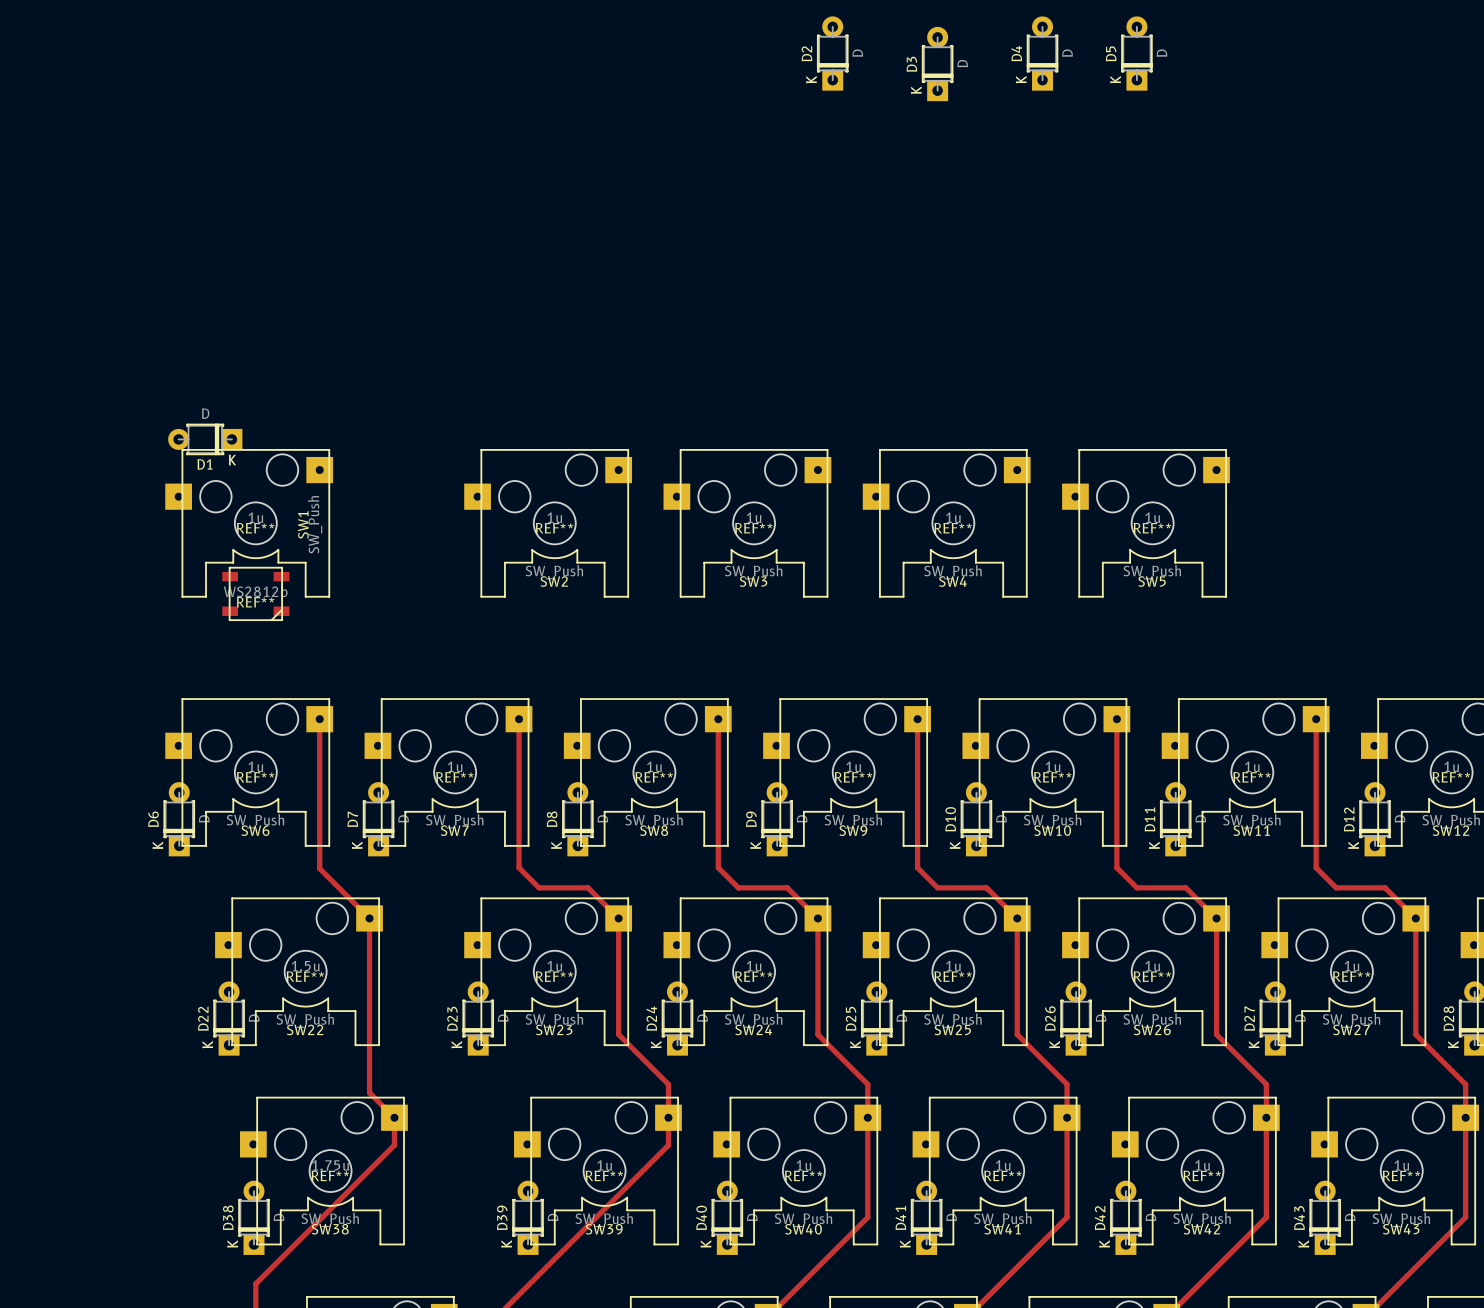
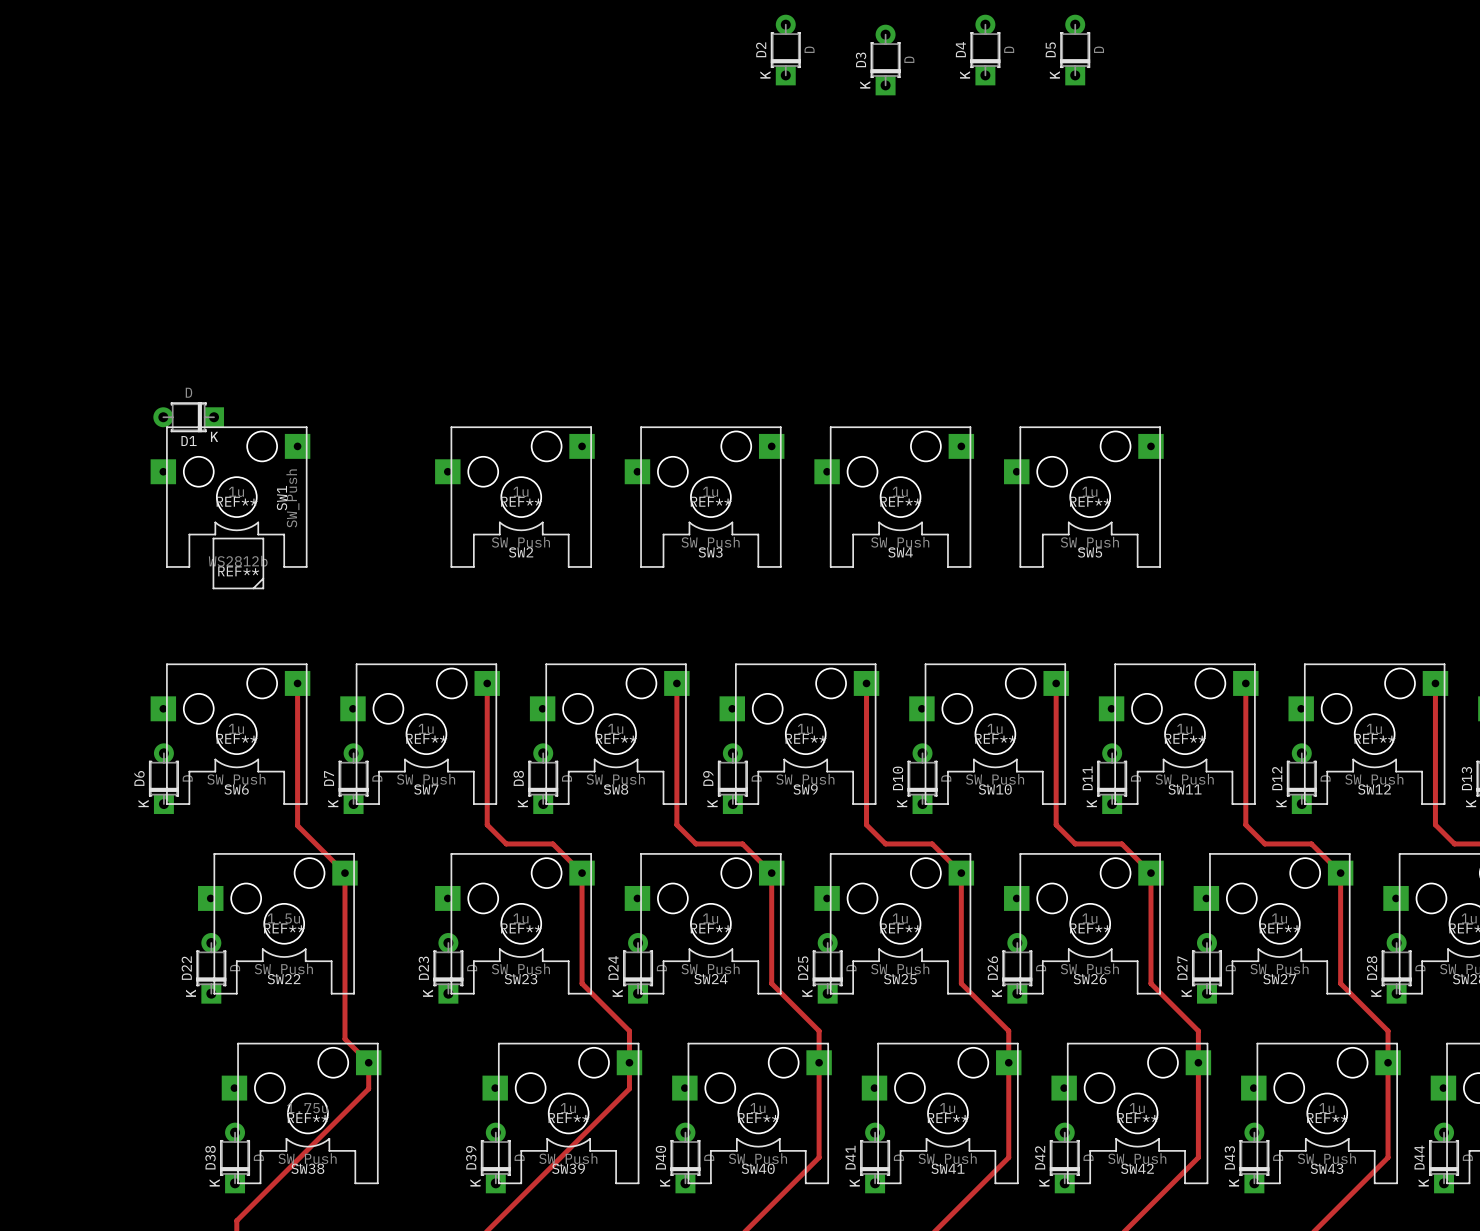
REF** footprint: [222, 567, 290, 621] -> [212, 537, 264, 590]

